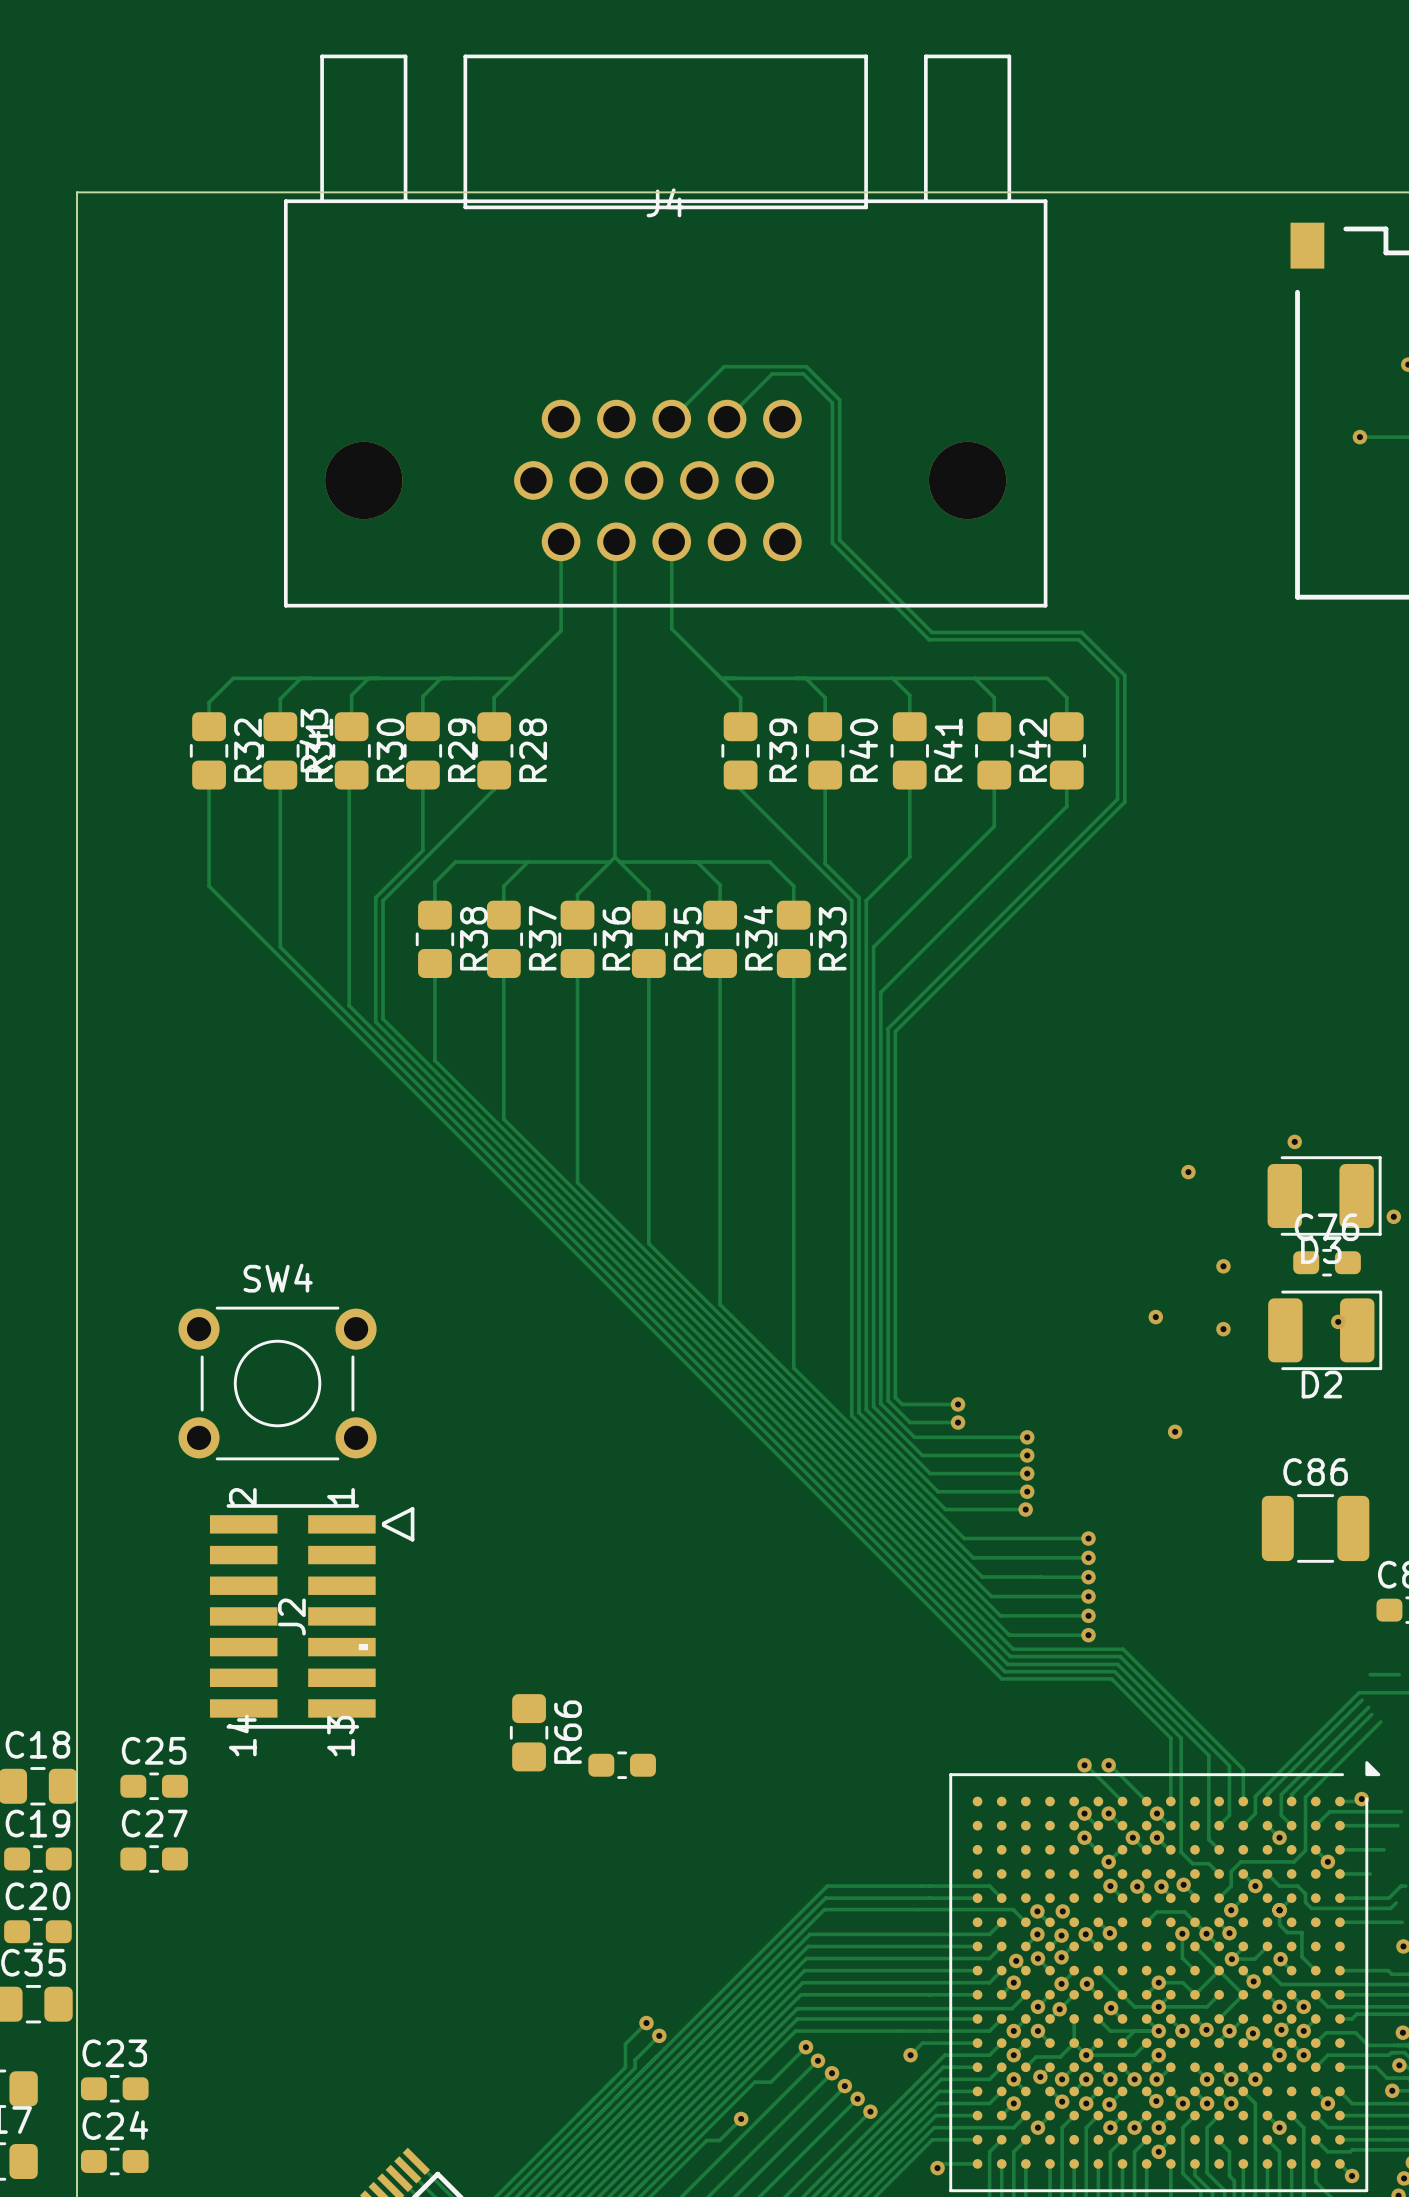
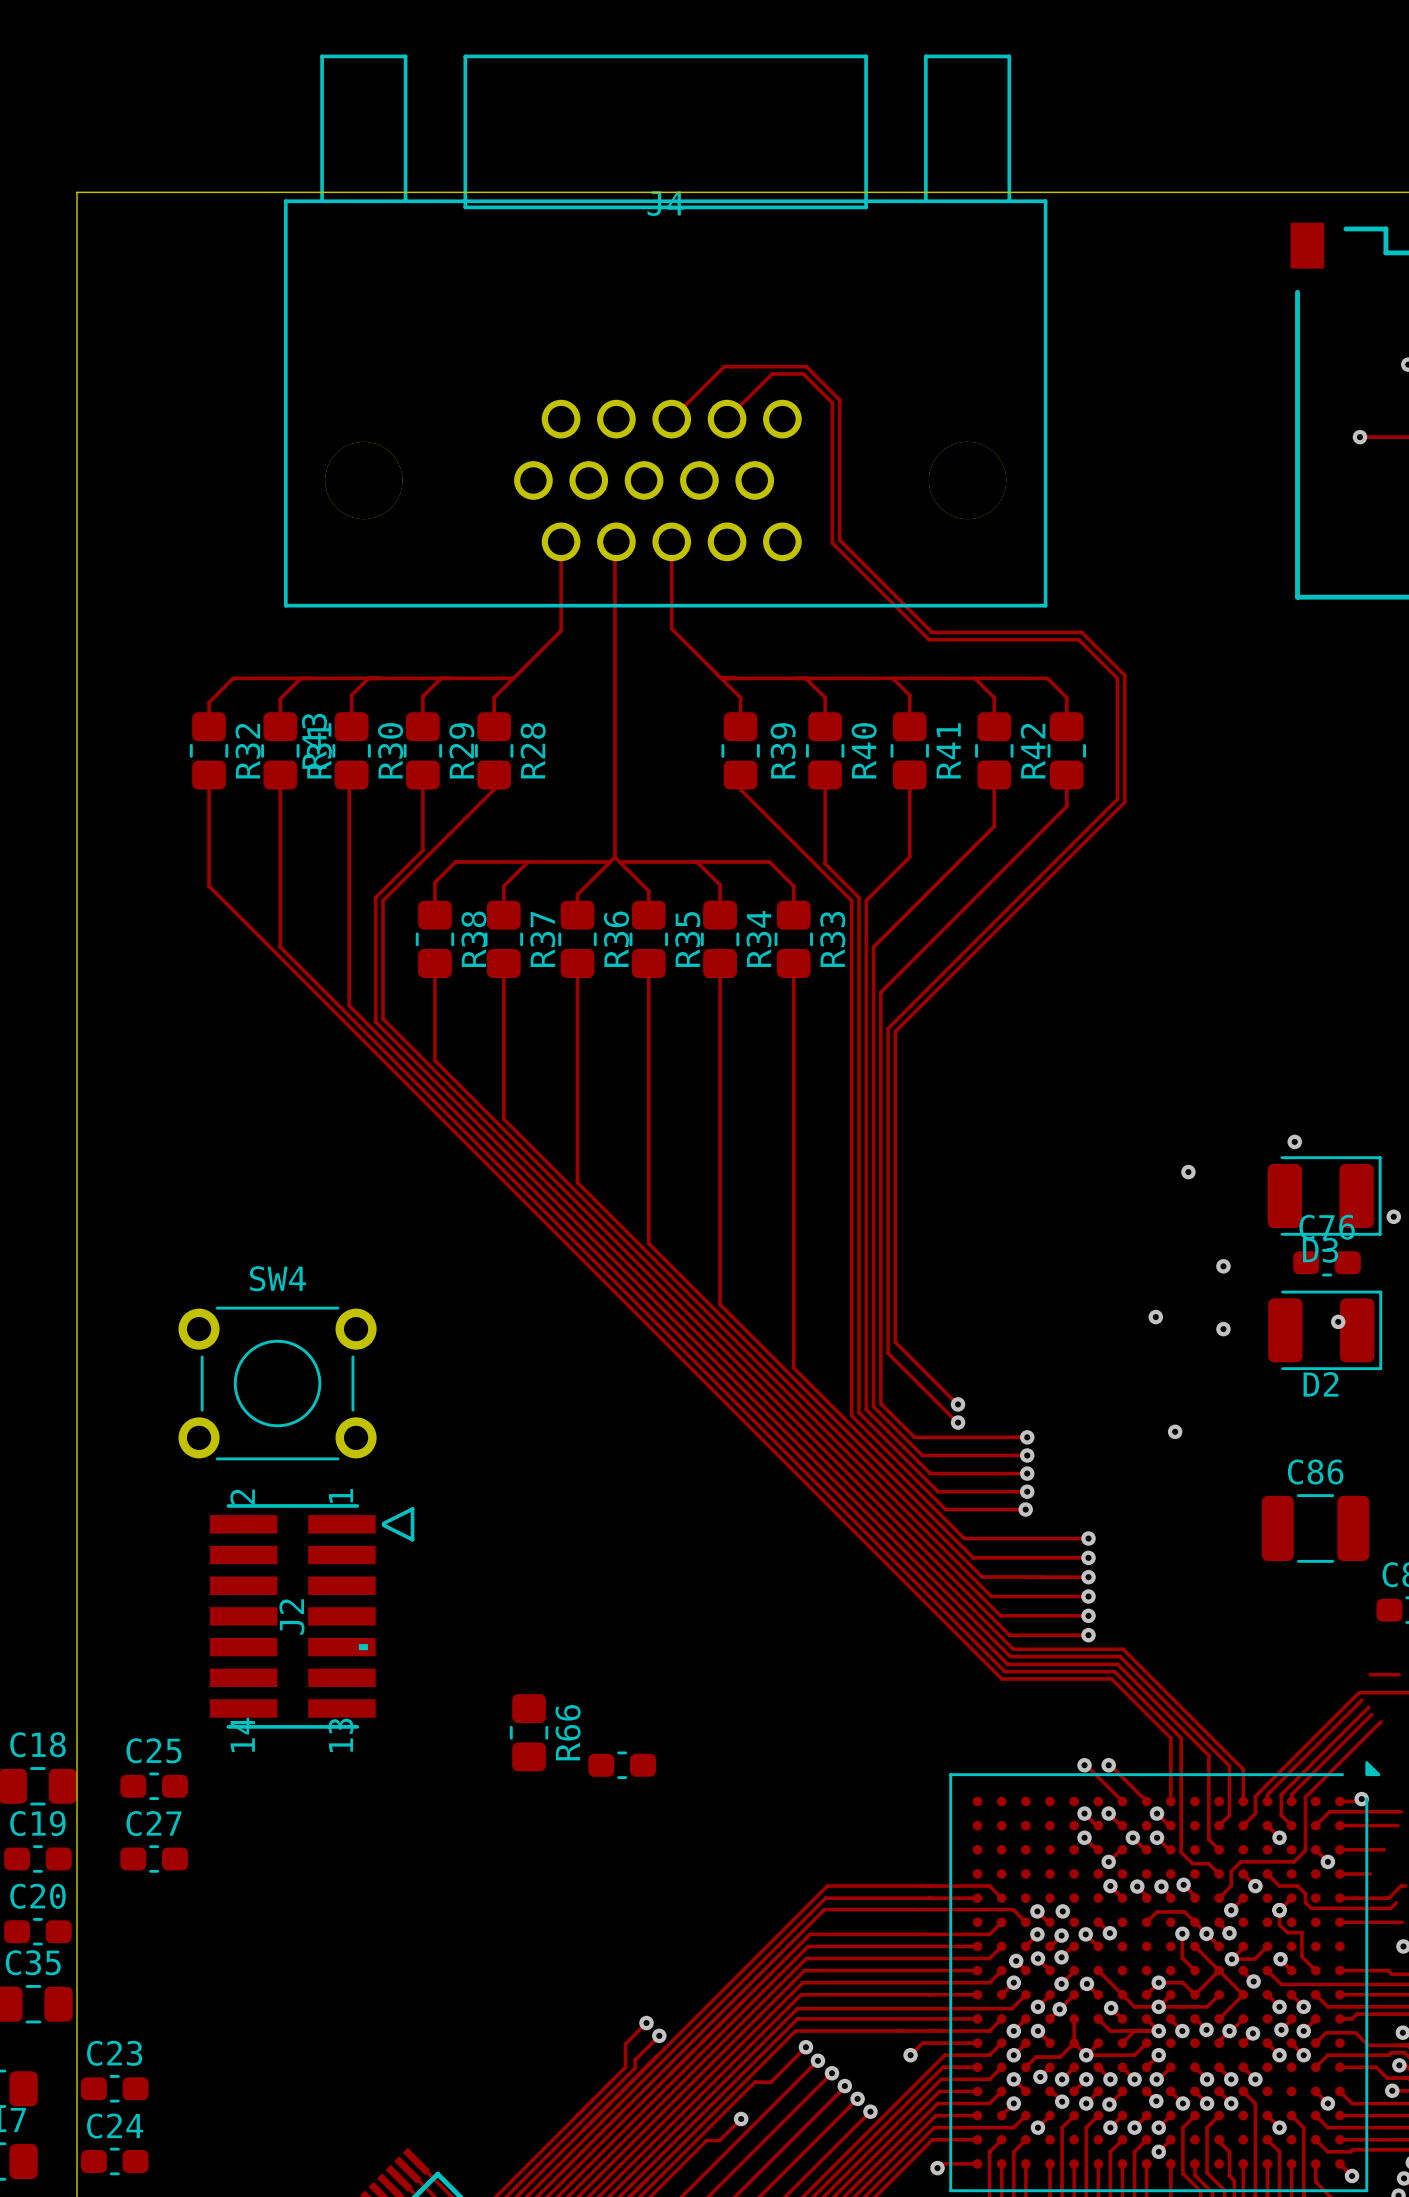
track: (895, 1342) (895, 1397) (902, 1404) (957, 1404) -> (895, 1342) (957, 1404)
track: (888, 1353) (888, 1400) (909, 1422) (957, 1422) -> (888, 1353) (957, 1422)

